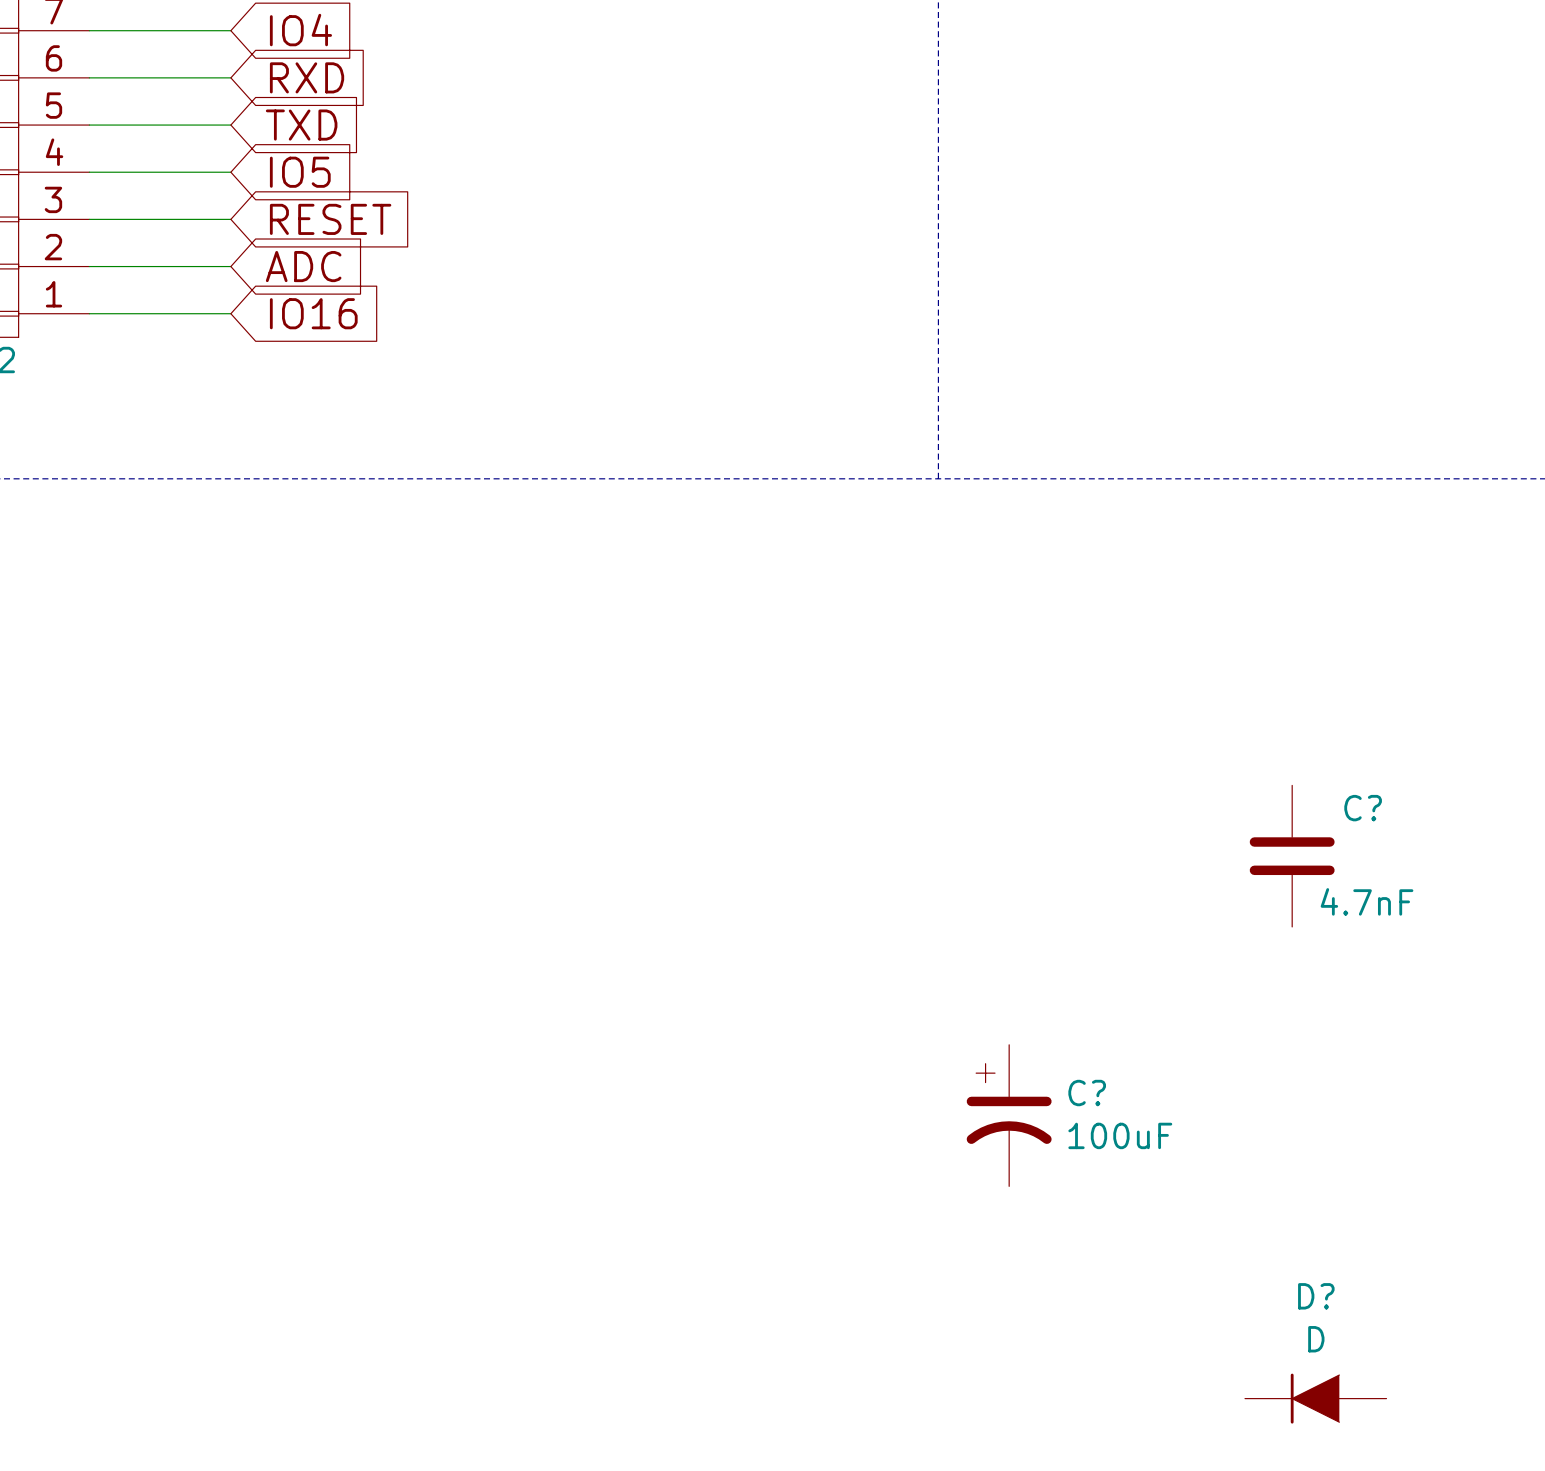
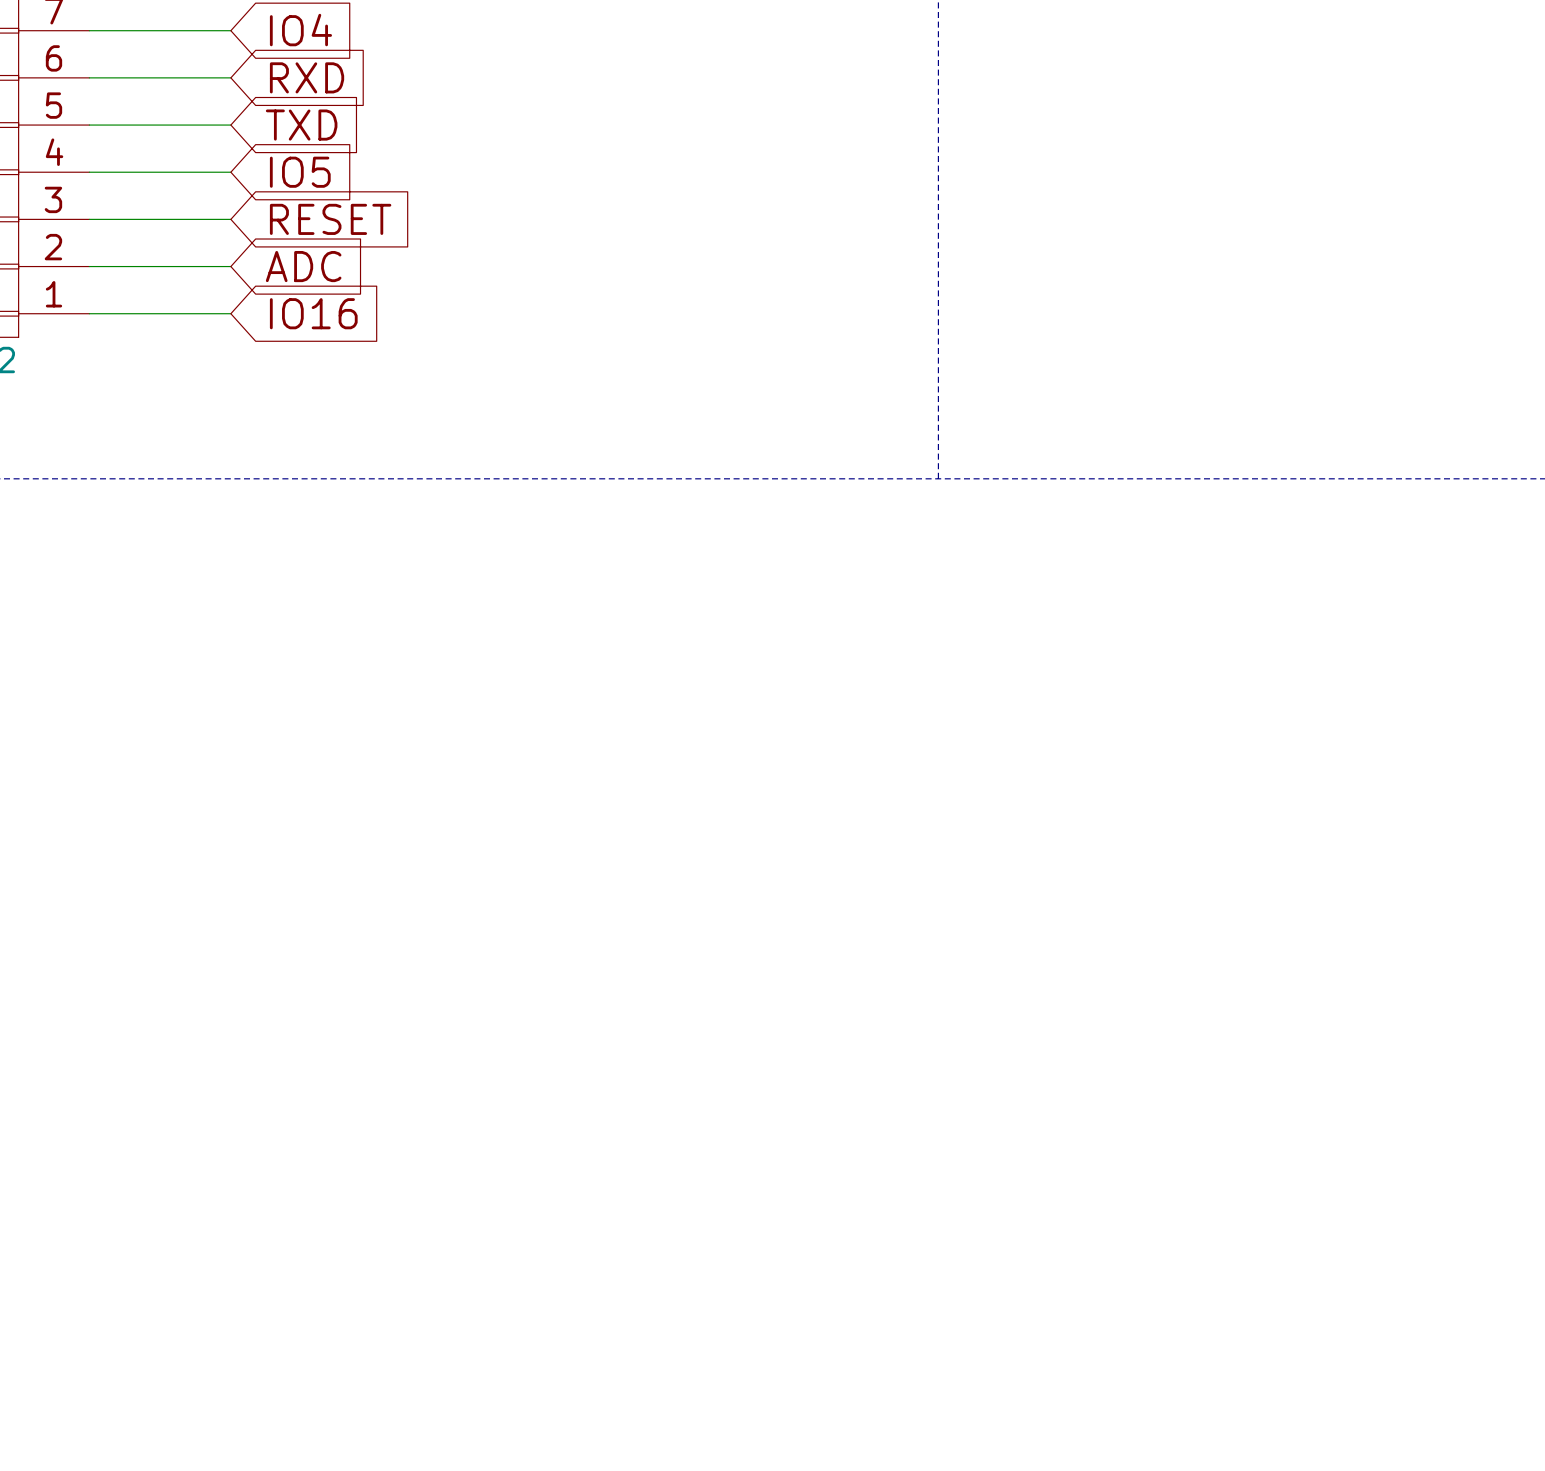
C?: 4.7nF (1292, 856) -> none
C?: 100uF (1009, 1115) -> none
D?: D (1315, 1398) -> none

